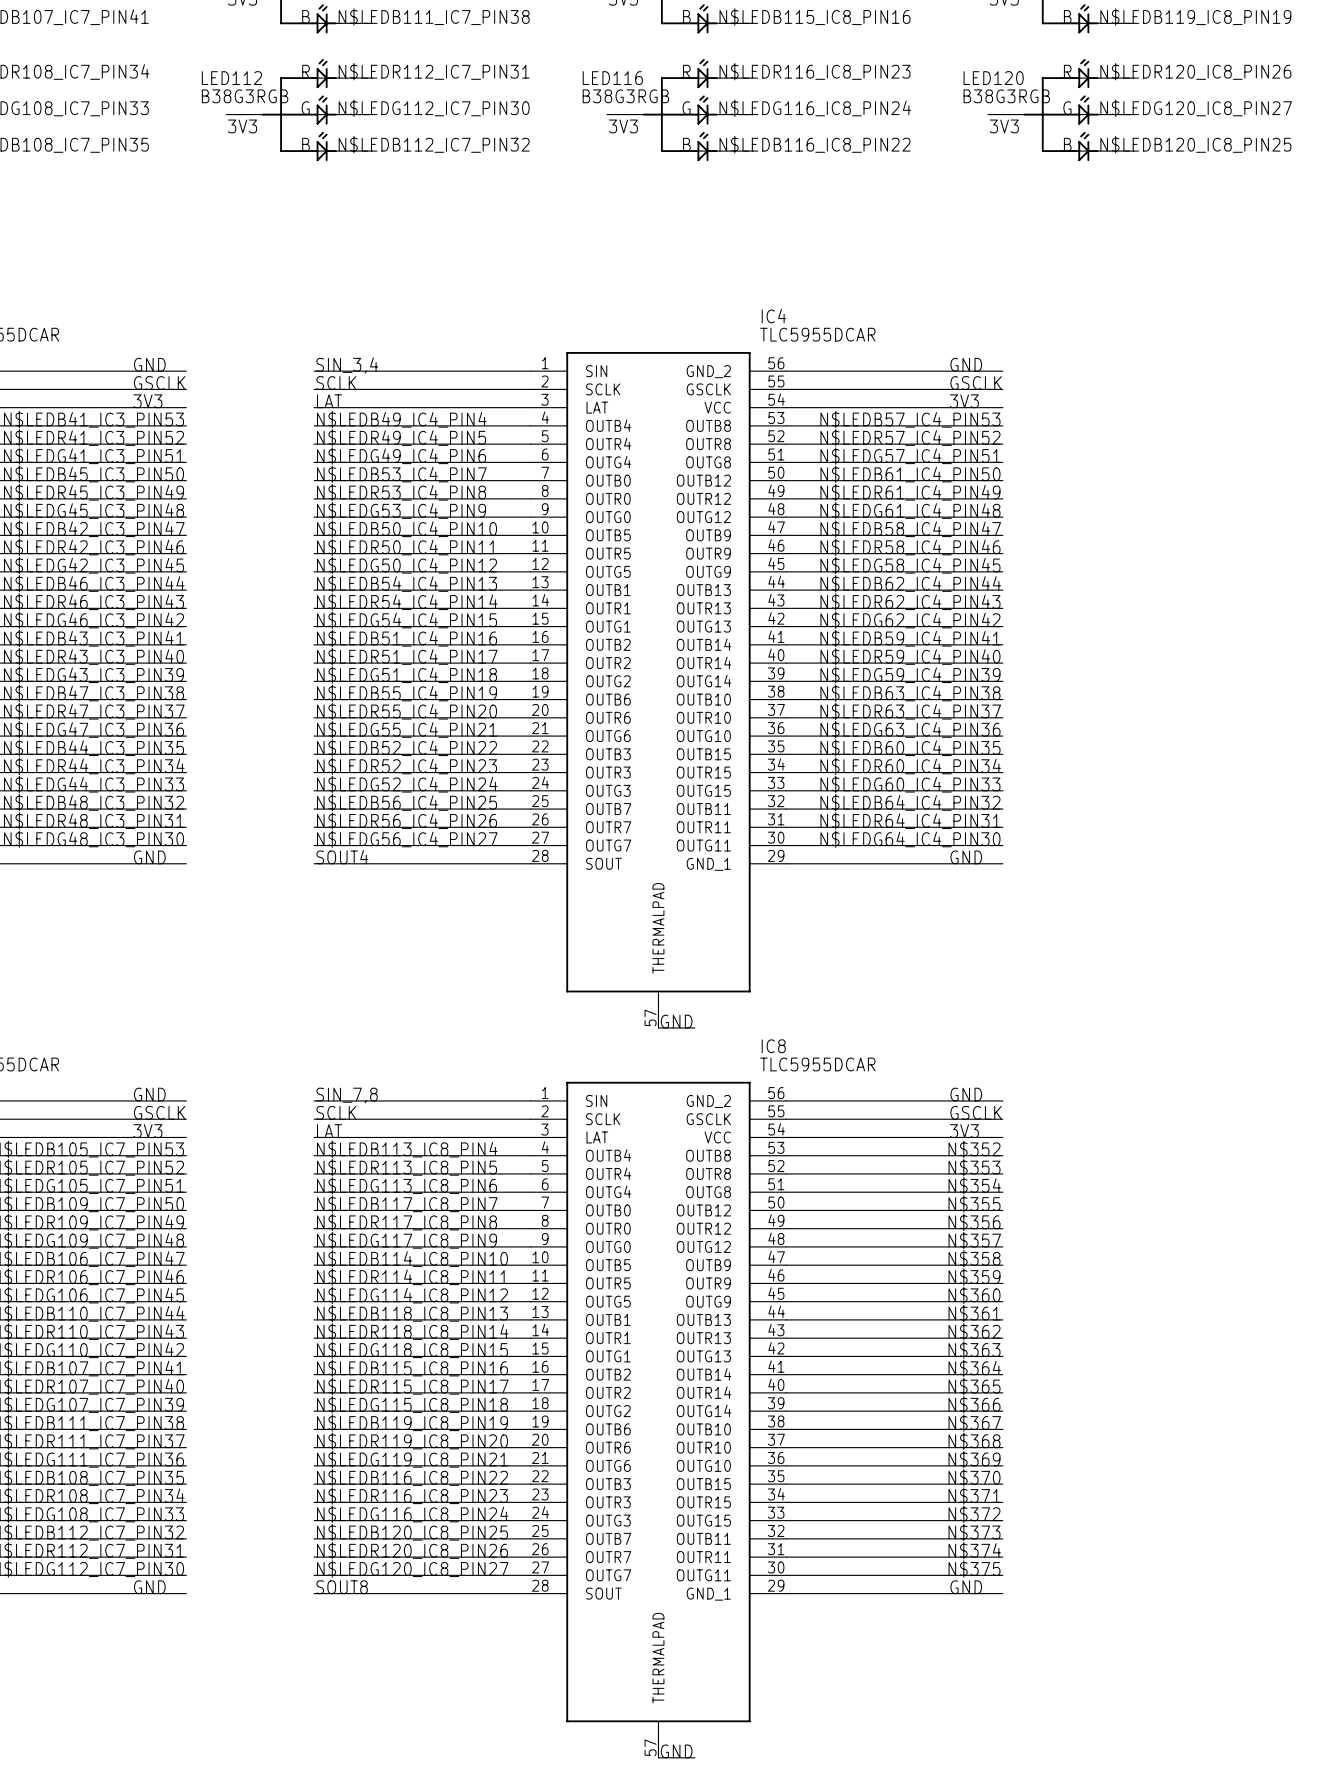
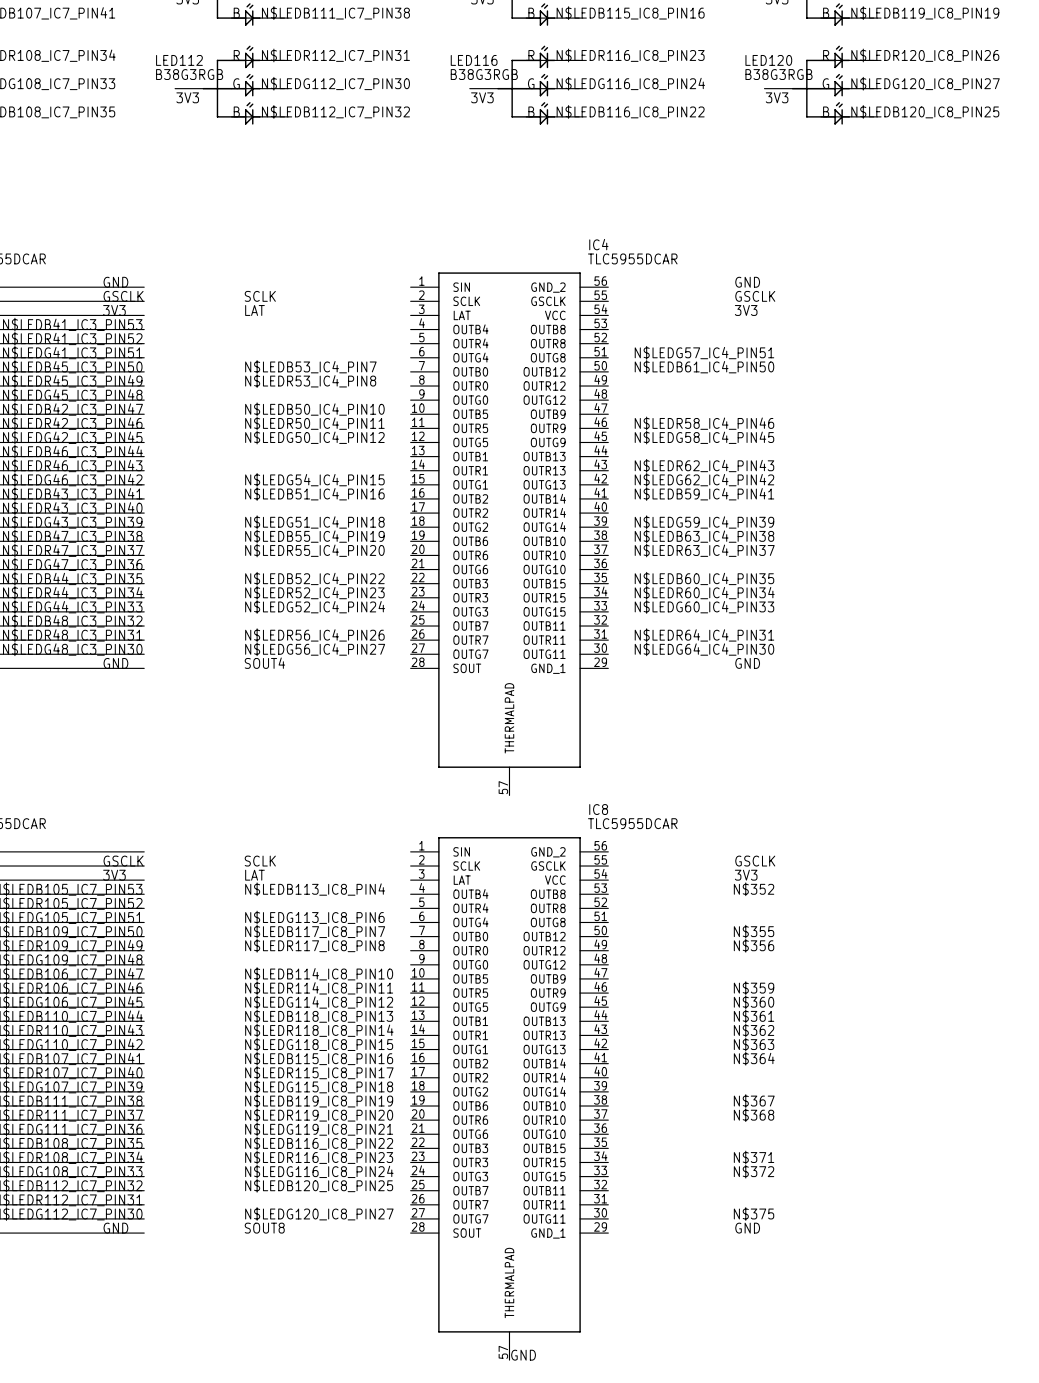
label: SIN_3,4 (347, 365) -> none
wire: (314, 371) (530, 371) -> none
wire: (786, 371) (1002, 371) -> none
wire: (314, 389) (530, 389) -> none
wire: (786, 389) (1002, 389) -> none
wire: (314, 407) (530, 407) -> none
wire: (786, 407) (1002, 407) -> none
label: N$LEDB49_IC4_PIN4 (401, 419) -> none
label: N$LEDB57_IC4_PIN53 (910, 419) -> none
wire: (314, 425) (530, 425) -> none
wire: (786, 425) (1002, 425) -> none
label: N$LEDR49_IC4_PIN5 (401, 437) -> none
label: N$LEDR57_IC4_PIN52 (910, 437) -> none
wire: (314, 444) (530, 444) -> none
wire: (786, 444) (1002, 444) -> none
label: N$LEDG49_IC4_PIN6 (401, 456) -> none
wire: (314, 462) (530, 462) -> none
wire: (786, 462) (1002, 462) -> none
wire: (314, 480) (530, 480) -> none
wire: (786, 480) (1002, 480) -> none
label: N$LEDR61_IC4_PIN49 (910, 492) -> none
wire: (314, 498) (530, 498) -> none
wire: (786, 498) (1002, 498) -> none
label: N$LEDG53_IC4_PIN9 (401, 510) -> none
label: N$LEDG61_IC4_PIN48 (910, 510) -> none
wire: (314, 517) (530, 517) -> none
wire: (786, 517) (1002, 517) -> none
label: N$LEDB58_IC4_PIN47 (910, 528) -> none
wire: (314, 535) (530, 535) -> none
wire: (786, 535) (1002, 535) -> none
wire: (314, 553) (530, 553) -> none
wire: (786, 553) (1002, 553) -> none
wire: (314, 571) (530, 571) -> none
wire: (786, 571) (1002, 571) -> none
label: N$LEDB54_IC4_PIN13 (407, 583) -> none
label: N$LEDB62_IC4_PIN44 (910, 583) -> none
wire: (314, 590) (530, 590) -> none
wire: (786, 590) (1002, 590) -> none
label: N$LEDR54_IC4_PIN14 (407, 601) -> none
wire: (314, 608) (530, 608) -> none
wire: (786, 608) (1002, 608) -> none
wire: (314, 626) (530, 626) -> none
wire: (786, 626) (1002, 626) -> none
wire: (314, 644) (530, 644) -> none
wire: (786, 644) (1002, 644) -> none
label: N$LEDR51_IC4_PIN17 (407, 656) -> none
label: N$LEDR59_IC4_PIN40 (910, 656) -> none
wire: (314, 663) (530, 663) -> none
wire: (786, 663) (1002, 663) -> none
wire: (314, 681) (530, 681) -> none
wire: (786, 681) (1002, 681) -> none
wire: (314, 699) (530, 699) -> none
wire: (786, 699) (1002, 699) -> none
wire: (314, 717) (530, 717) -> none
wire: (786, 717) (1002, 717) -> none
label: N$LEDG55_IC4_PIN21 (407, 729) -> none
label: N$LEDG63_IC4_PIN36 (910, 729) -> none
wire: (314, 736) (530, 736) -> none
wire: (786, 736) (1002, 736) -> none
wire: (314, 754) (530, 754) -> none
wire: (786, 754) (1002, 754) -> none
wire: (314, 772) (530, 772) -> none
wire: (786, 772) (1002, 772) -> none
wire: (314, 790) (530, 790) -> none
wire: (786, 790) (1002, 790) -> none
label: N$LEDB56_IC4_PIN25 (407, 802) -> none
label: N$LEDB64_IC4_PIN32 (910, 802) -> none
wire: (314, 809) (530, 809) -> none
wire: (786, 809) (1002, 809) -> none
wire: (314, 827) (530, 827) -> none
wire: (786, 827) (1002, 827) -> none
wire: (314, 845) (530, 845) -> none
wire: (786, 845) (1002, 845) -> none
wire: (314, 863) (530, 863) -> none
wire: (786, 863) (1002, 863) -> none
label: GND (676, 1021) -> none
wire: (658, 1027) (694, 1027) -> none
label: GND (149, 1094) -> none
label: GND (966, 1094) -> none
label: SIN_7,8 (347, 1095) -> none
wire: (314, 1100) (530, 1100) -> none
wire: (786, 1100) (1002, 1100) -> none
wire: (314, 1119) (530, 1119) -> none
wire: (786, 1119) (1002, 1119) -> none
wire: (314, 1137) (530, 1137) -> none
wire: (786, 1137) (1002, 1137) -> none
wire: (314, 1155) (530, 1155) -> none
wire: (786, 1155) (1002, 1155) -> none
label: N$LEDR113_IC8_PIN5 (407, 1167) -> none
label: N$353 (974, 1167) -> none
wire: (314, 1173) (530, 1173) -> none
wire: (786, 1173) (1002, 1173) -> none
label: N$354 (974, 1185) -> none
wire: (314, 1192) (530, 1192) -> none
wire: (786, 1192) (1002, 1192) -> none
wire: (314, 1210) (530, 1210) -> none
wire: (786, 1210) (1002, 1210) -> none
wire: (314, 1228) (530, 1228) -> none
wire: (786, 1228) (1002, 1228) -> none
label: N$LEDG117_IC8_PIN9 (407, 1240) -> none
label: N$357 (974, 1240) -> none
wire: (314, 1246) (530, 1246) -> none
wire: (786, 1246) (1002, 1246) -> none
label: N$358 (974, 1258) -> none
wire: (314, 1265) (530, 1265) -> none
wire: (786, 1265) (1002, 1265) -> none
wire: (314, 1283) (530, 1283) -> none
wire: (786, 1283) (1002, 1283) -> none
wire: (314, 1301) (530, 1301) -> none
wire: (786, 1301) (1002, 1301) -> none
wire: (314, 1319) (530, 1319) -> none
wire: (786, 1319) (1002, 1319) -> none
wire: (314, 1338) (530, 1338) -> none
wire: (786, 1338) (1002, 1338) -> none
wire: (314, 1356) (530, 1356) -> none
wire: (786, 1356) (1002, 1356) -> none
wire: (314, 1374) (530, 1374) -> none
wire: (786, 1374) (1002, 1374) -> none
label: N$365 (974, 1386) -> none
wire: (314, 1392) (530, 1392) -> none
wire: (786, 1392) (1002, 1392) -> none
label: N$366 (974, 1404) -> none
wire: (314, 1411) (530, 1411) -> none
wire: (786, 1411) (1002, 1411) -> none
wire: (314, 1429) (530, 1429) -> none
wire: (786, 1429) (1002, 1429) -> none
wire: (314, 1447) (530, 1447) -> none
wire: (786, 1447) (1002, 1447) -> none
label: N$369 (974, 1459) -> none
wire: (314, 1465) (530, 1465) -> none
wire: (786, 1465) (1002, 1465) -> none
label: N$370 (974, 1477) -> none
wire: (314, 1484) (530, 1484) -> none
wire: (786, 1484) (1002, 1484) -> none
wire: (314, 1502) (530, 1502) -> none
wire: (786, 1502) (1002, 1502) -> none
wire: (314, 1520) (530, 1520) -> none
wire: (786, 1520) (1002, 1520) -> none
label: N$373 (974, 1532) -> none
wire: (314, 1538) (530, 1538) -> none
wire: (786, 1538) (1002, 1538) -> none
label: N$LEDR120_IC8_PIN26 (412, 1550) -> none
label: N$374 (974, 1550) -> none
wire: (314, 1557) (530, 1557) -> none
wire: (786, 1557) (1002, 1557) -> none
wire: (314, 1575) (530, 1575) -> none
wire: (786, 1575) (1002, 1575) -> none
wire: (314, 1593) (530, 1593) -> none
wire: (786, 1593) (1002, 1593) -> none
wire: (658, 1757) (694, 1757) -> none

